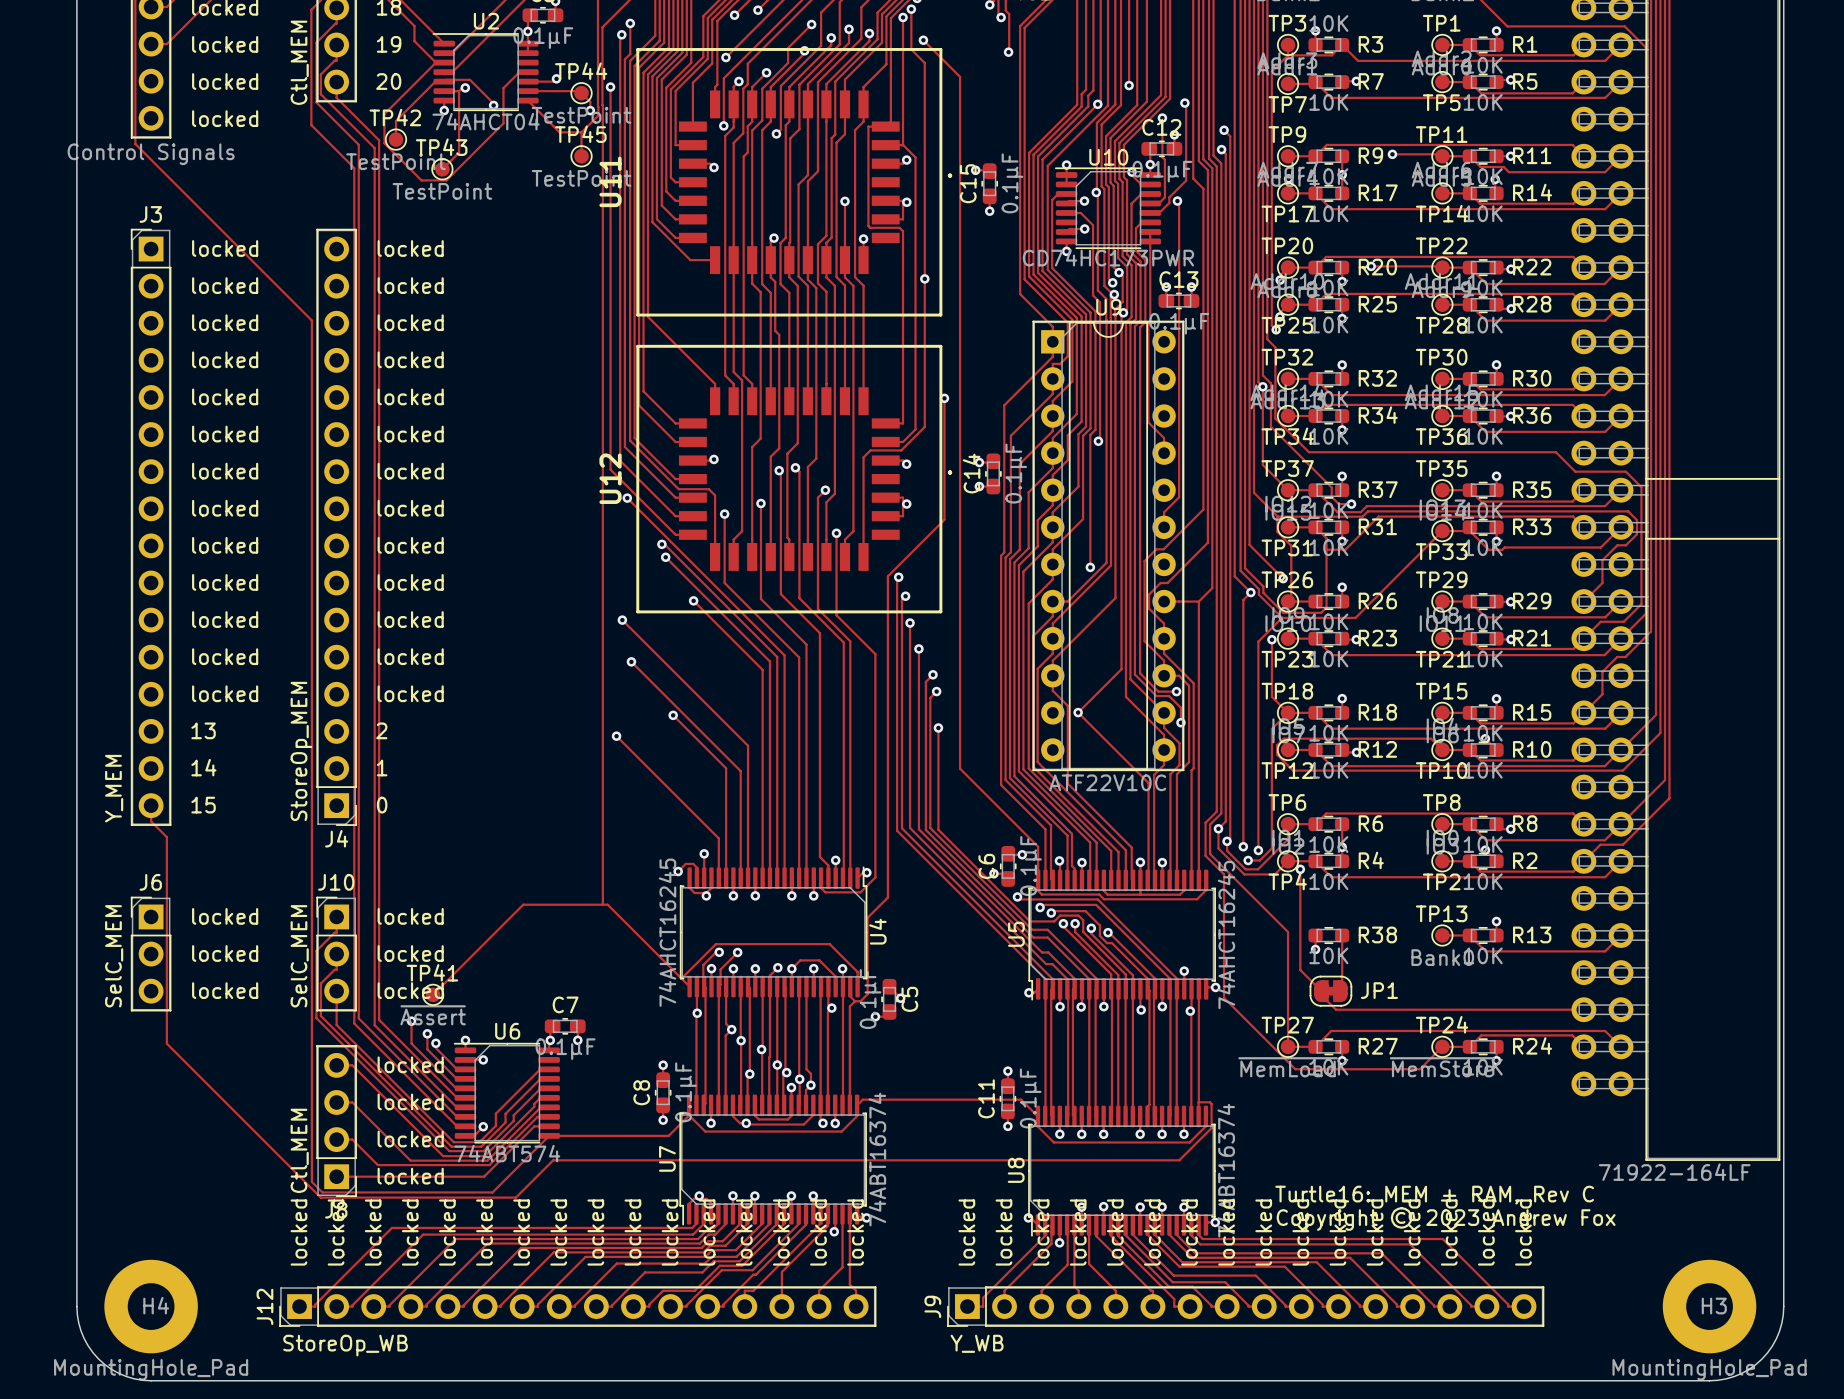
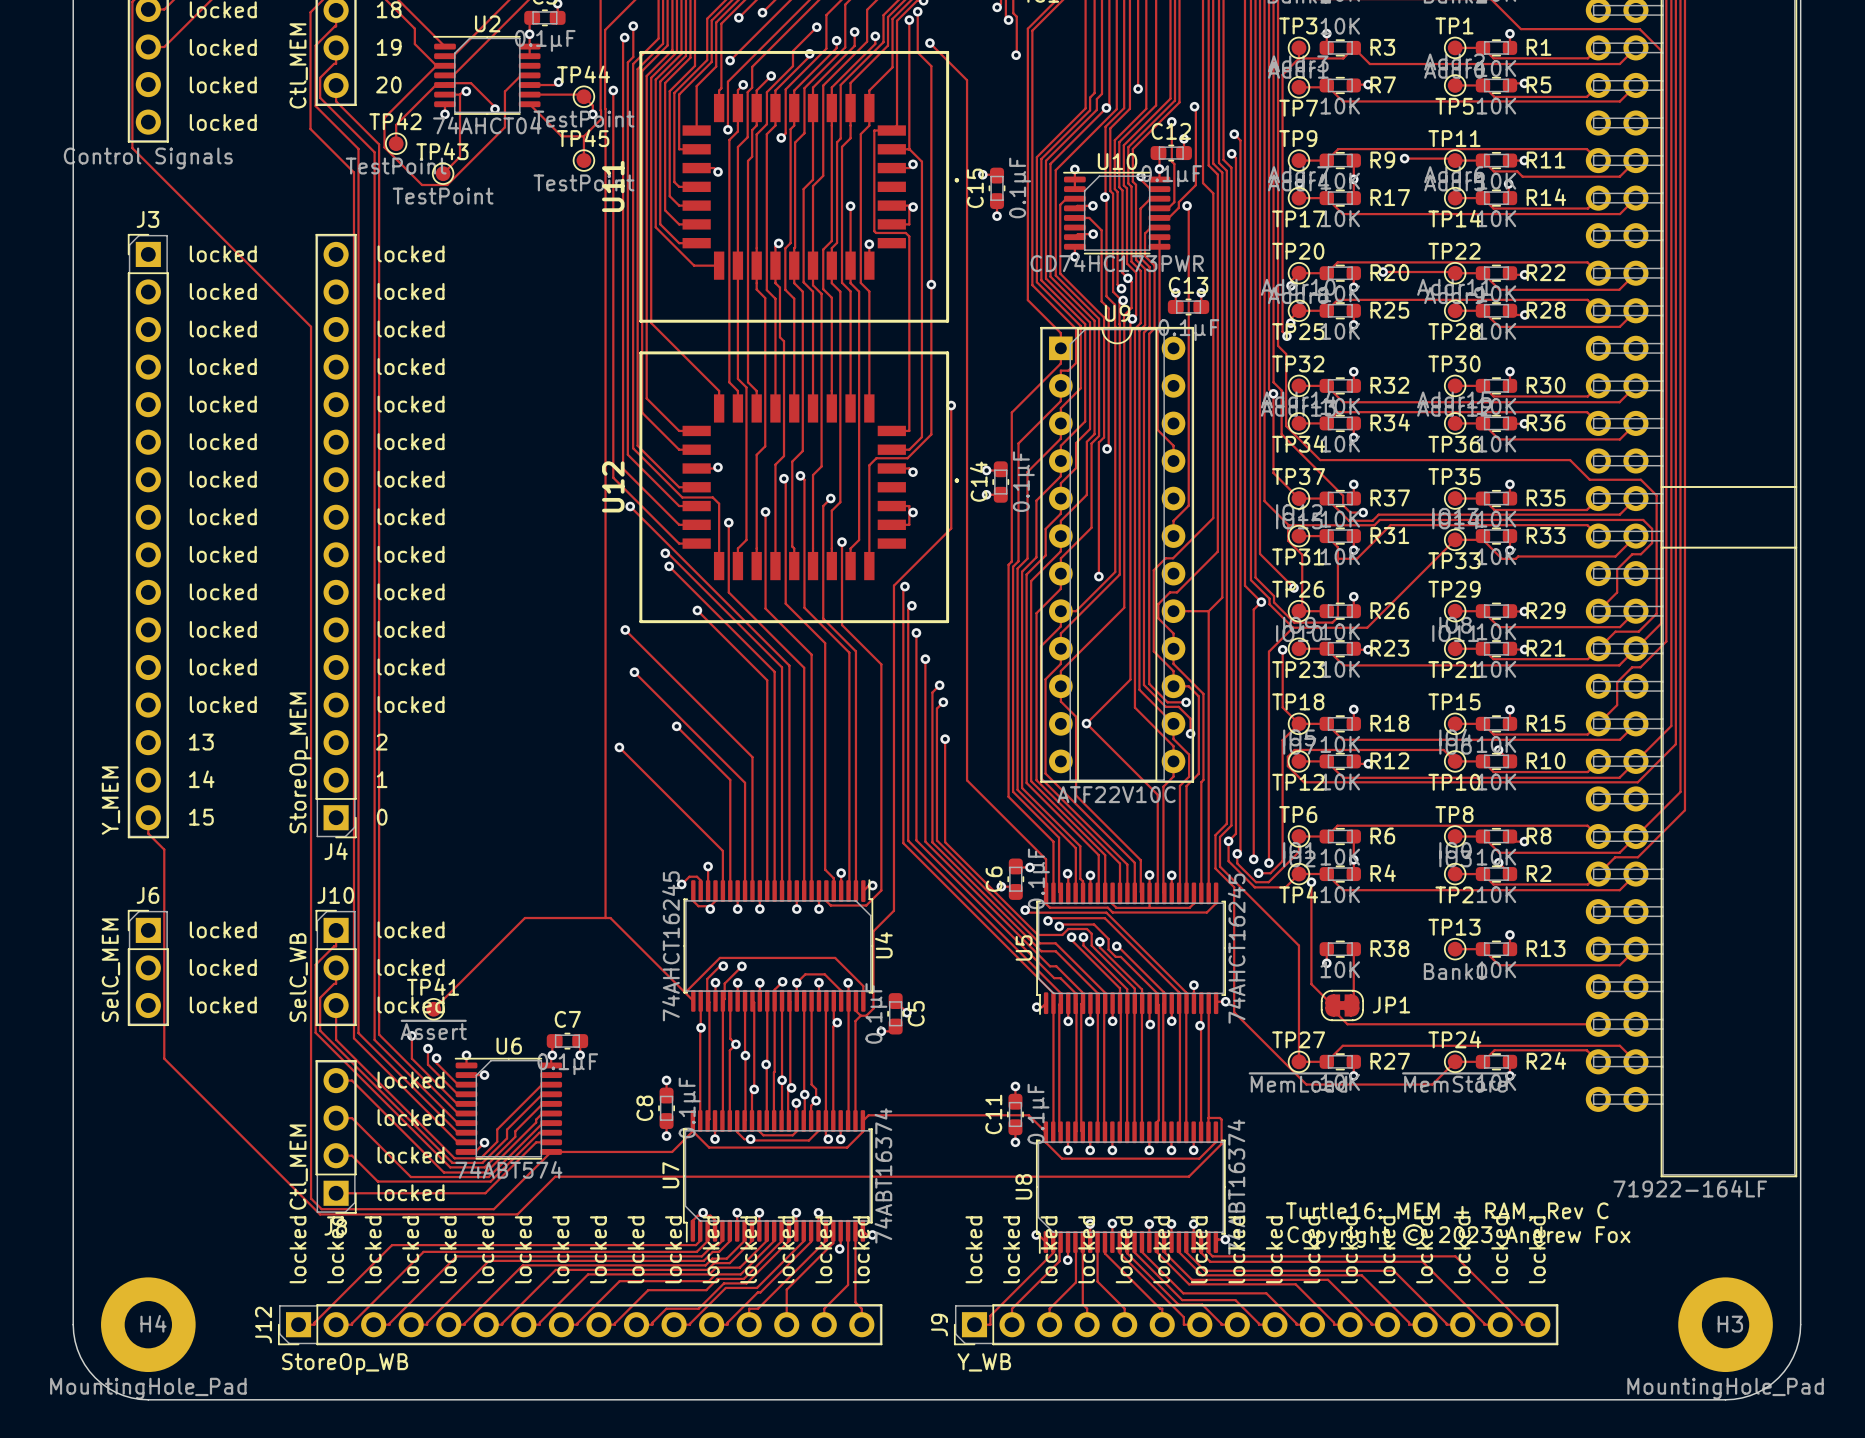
J10 value: SelC_MEM (299, 956) -> SelC_WB (298, 977)

